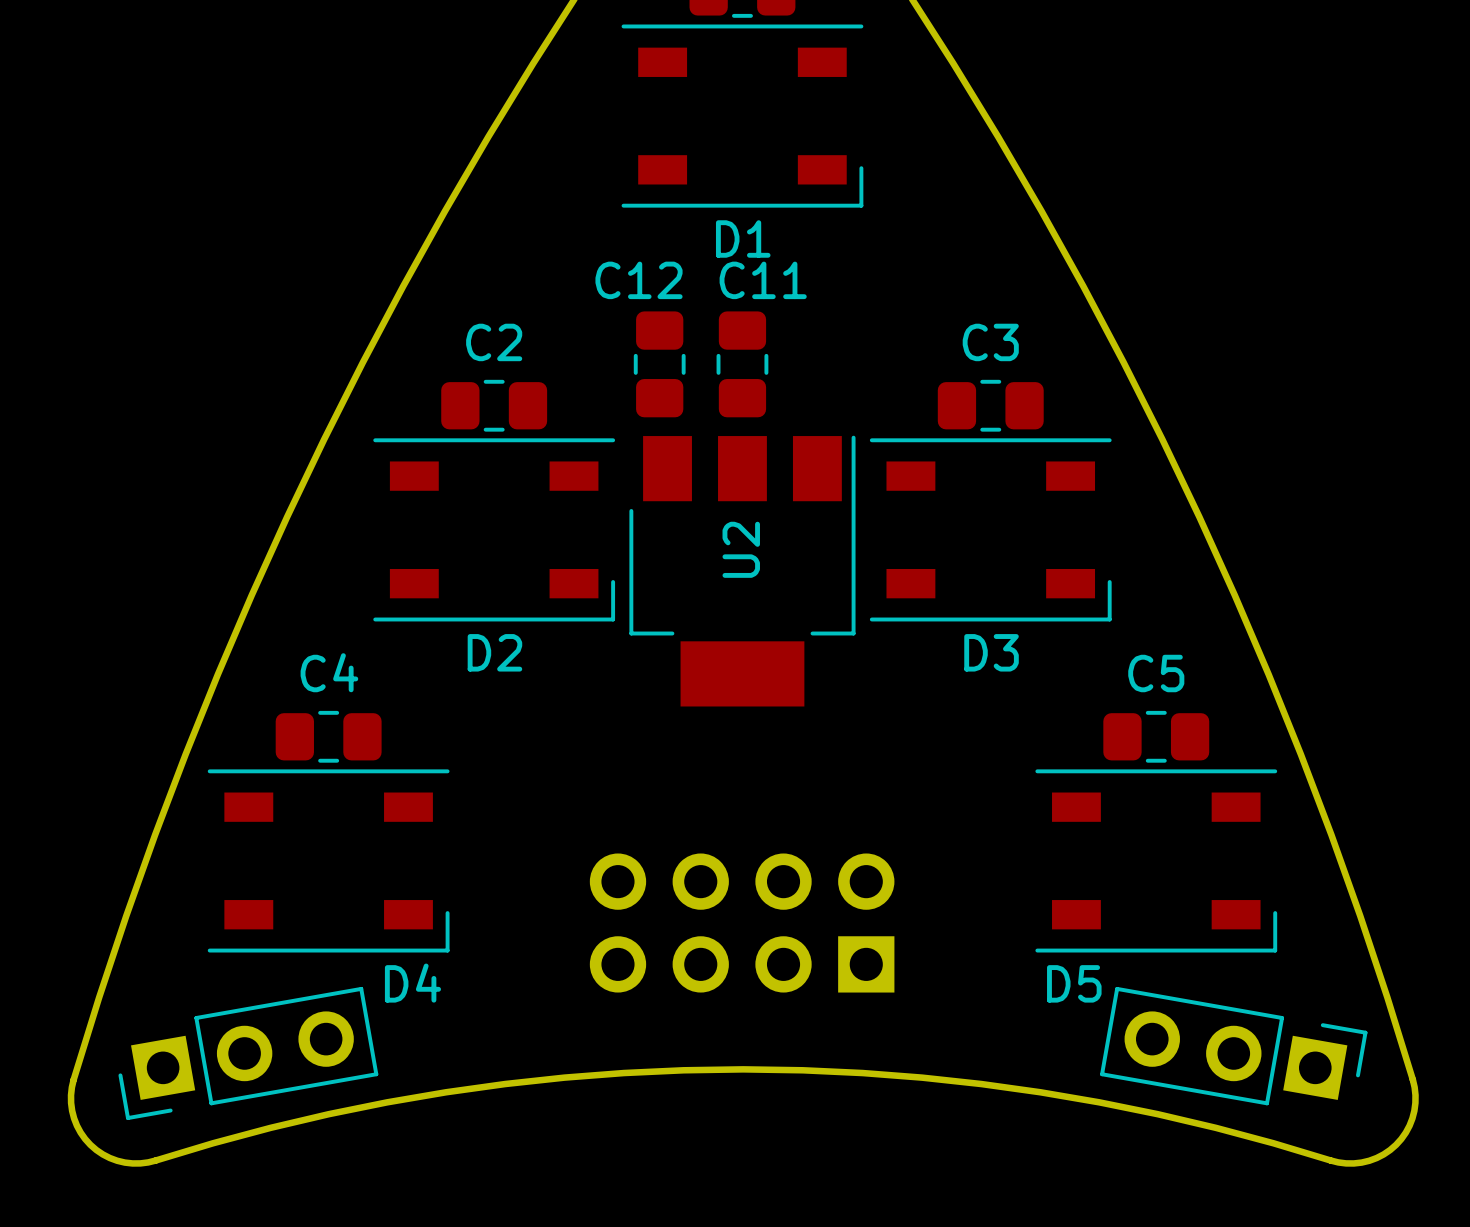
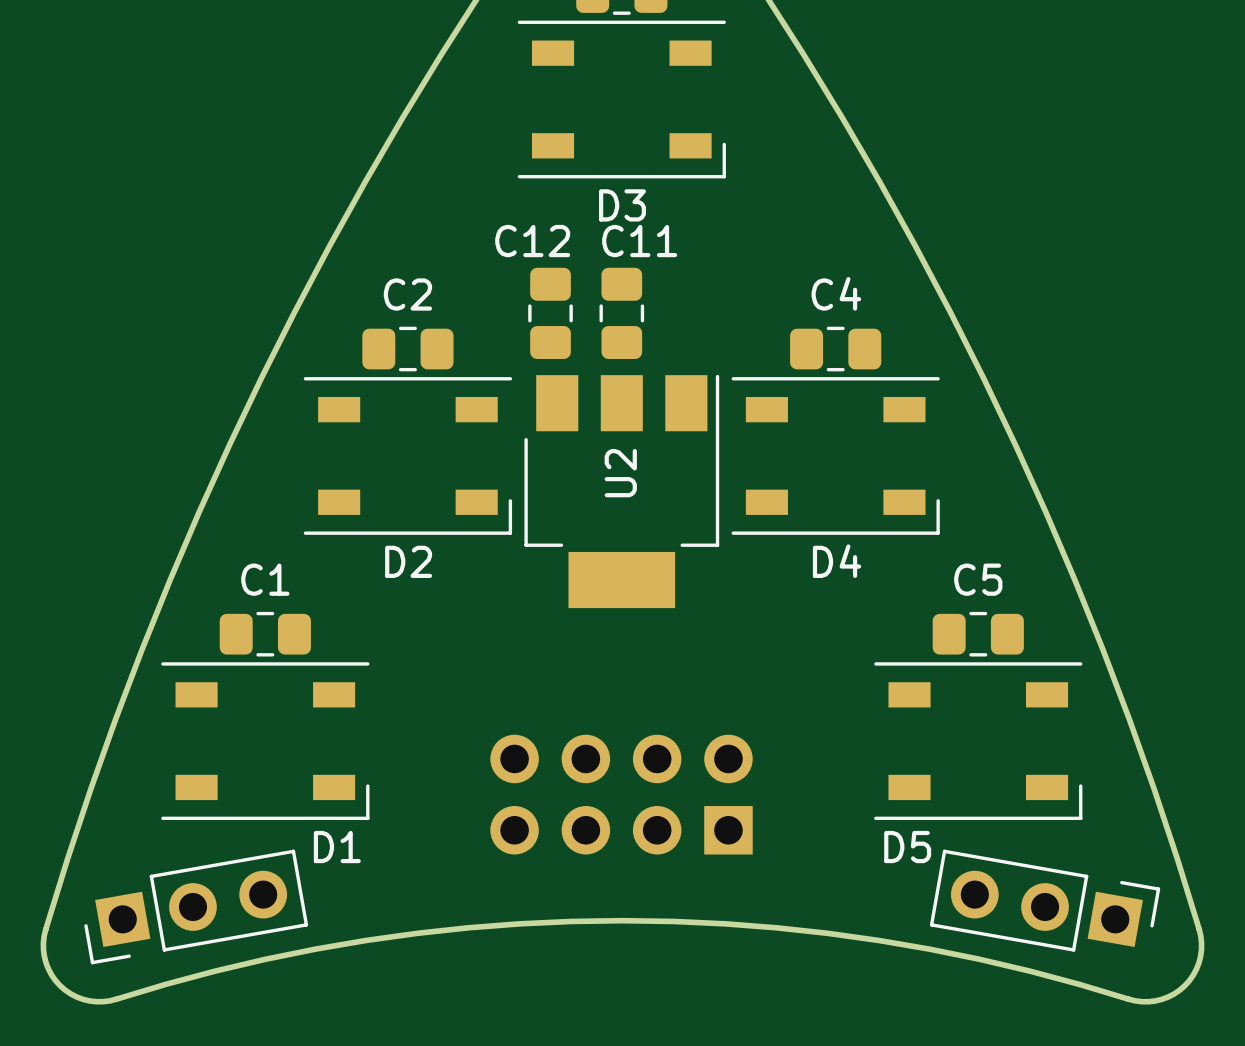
D1 name: D1 (743, 238) -> D3 (622, 205)
C3 name: C3 (990, 342) -> C4 (836, 293)
D3 name: D3 (991, 652) -> D4 (837, 561)
C4 name: C4 (329, 672) -> C1 (265, 579)
D4 name: D4 (412, 983) -> D1 (337, 847)

